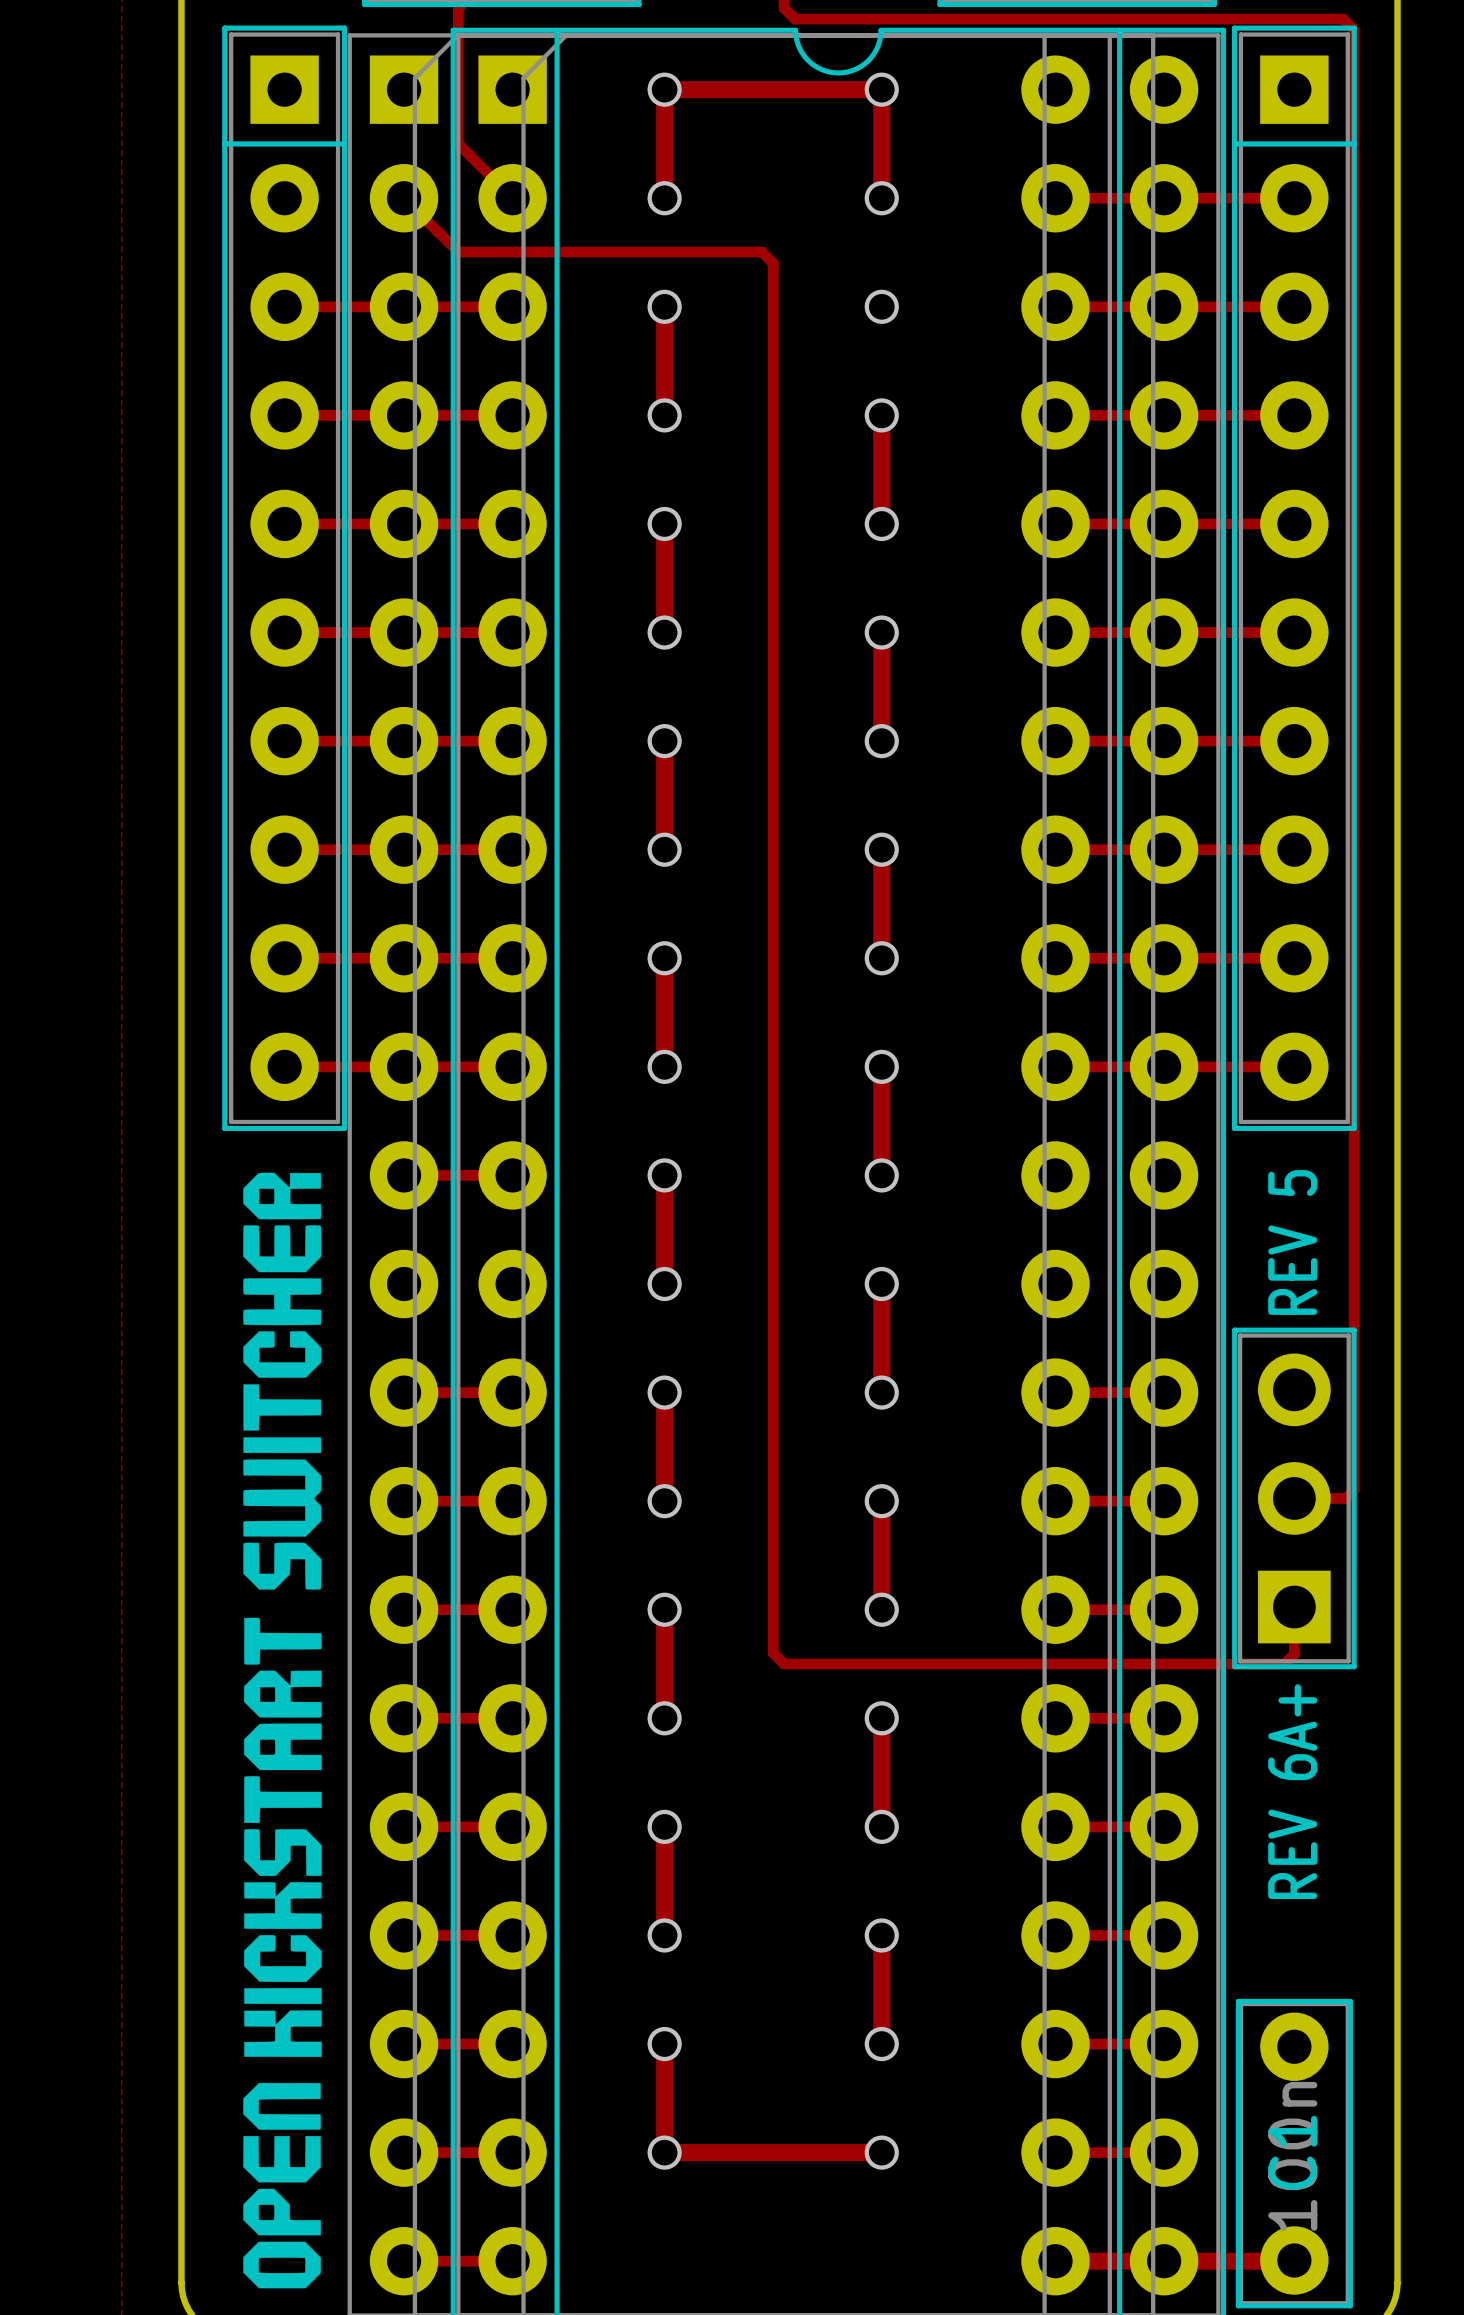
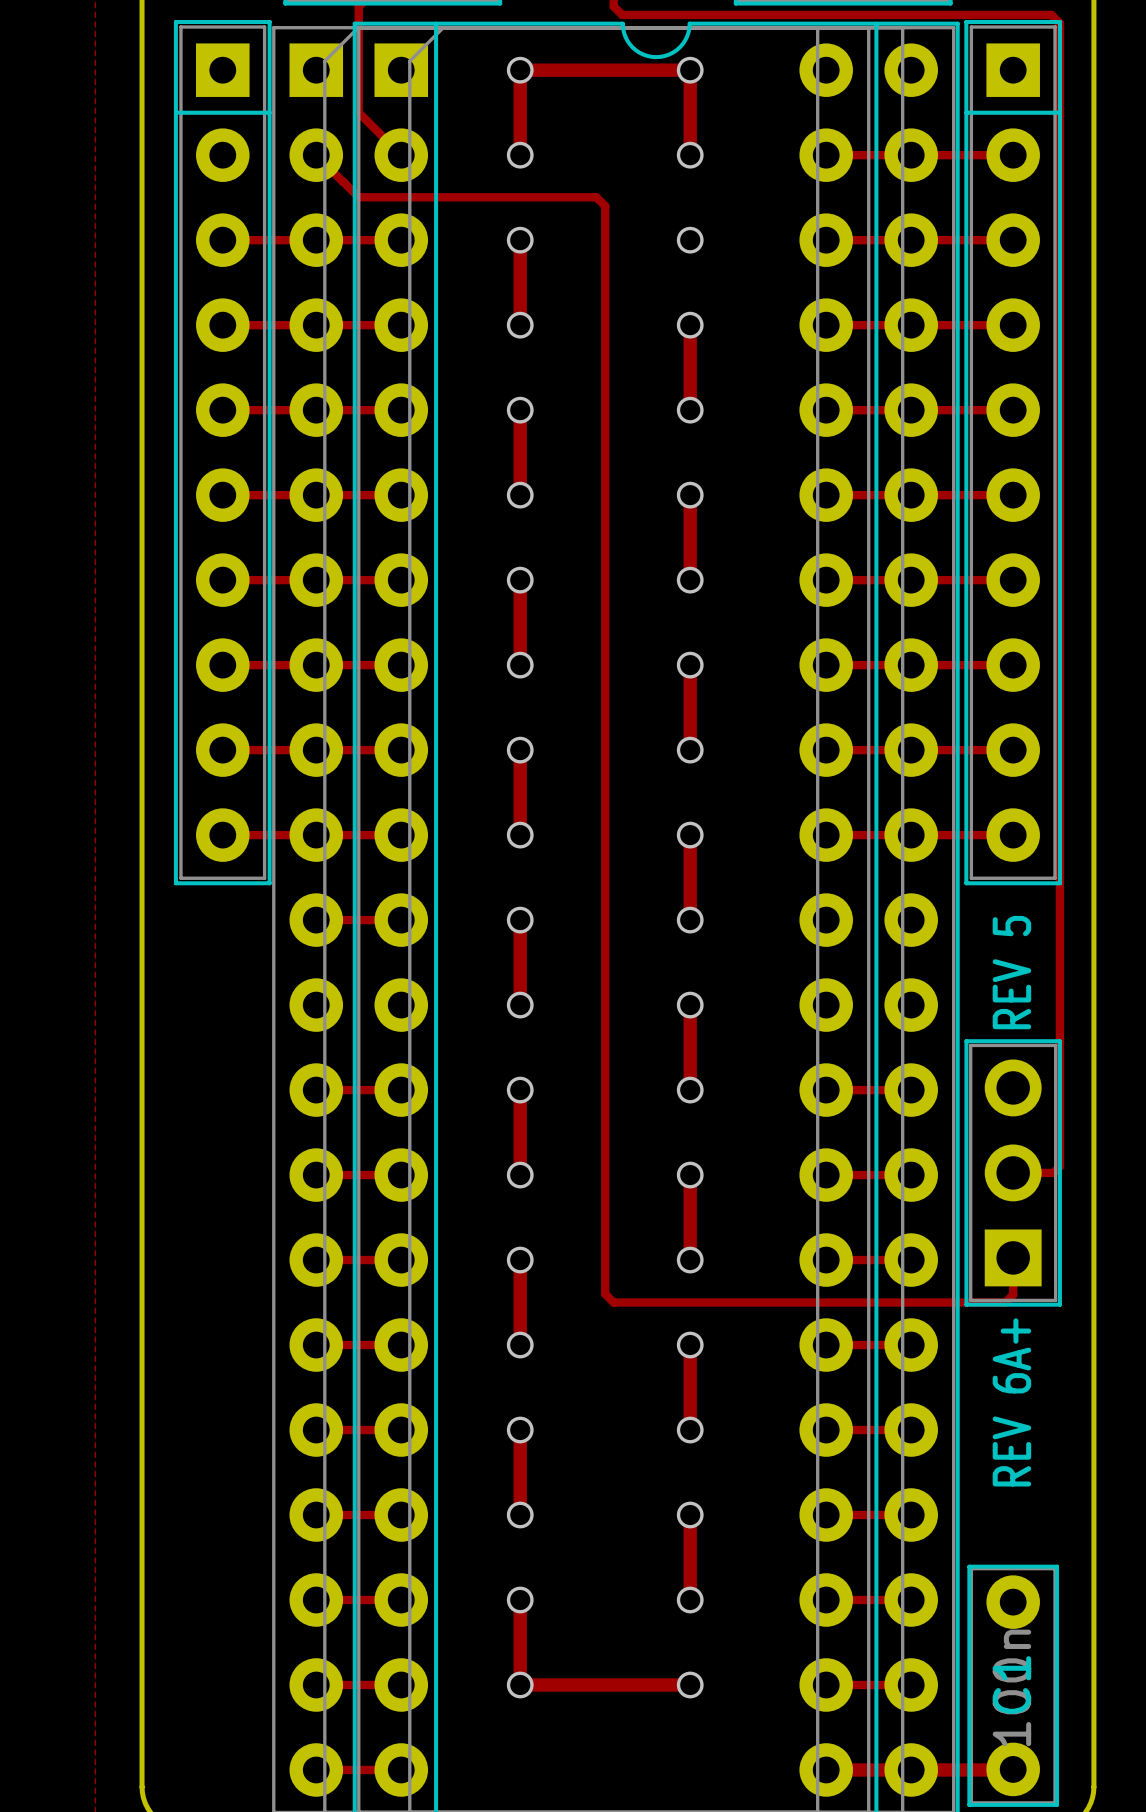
drawing: [243, 1172, 322, 2289] -> none

